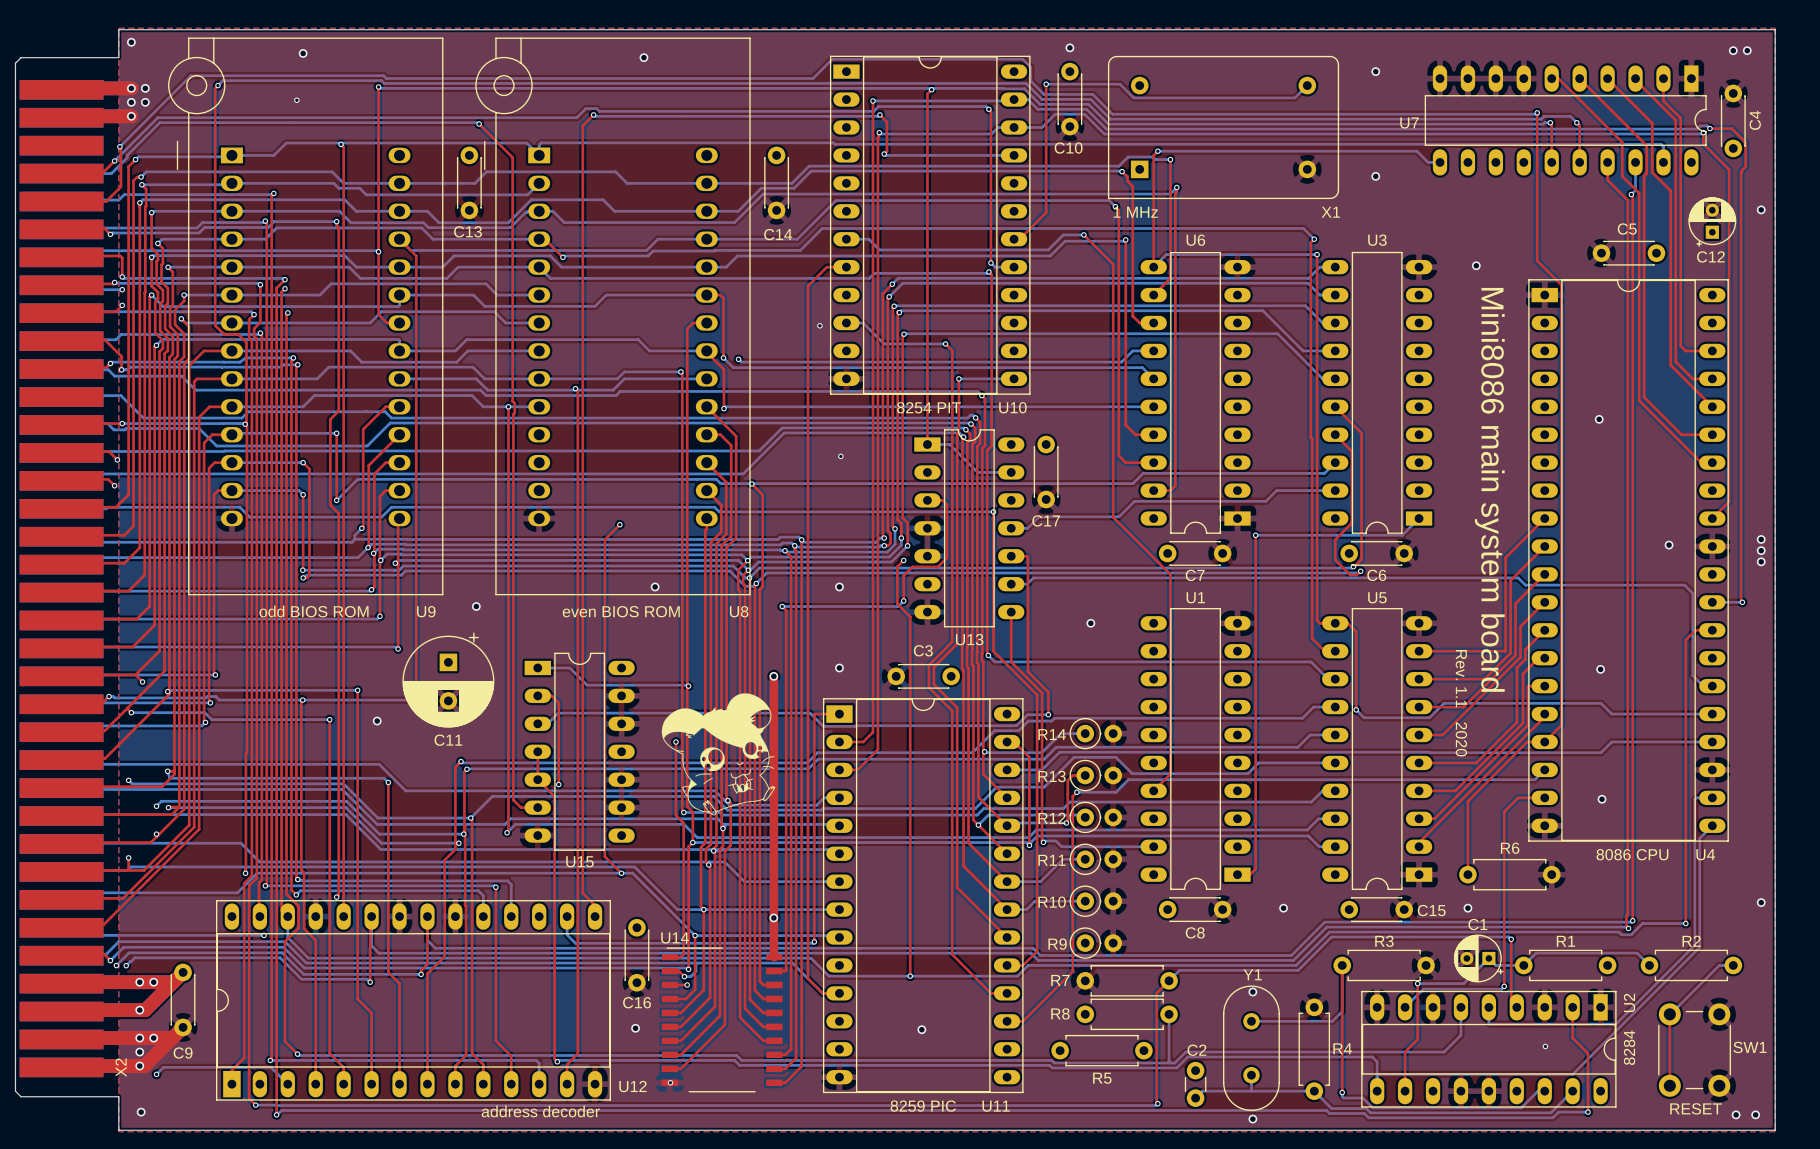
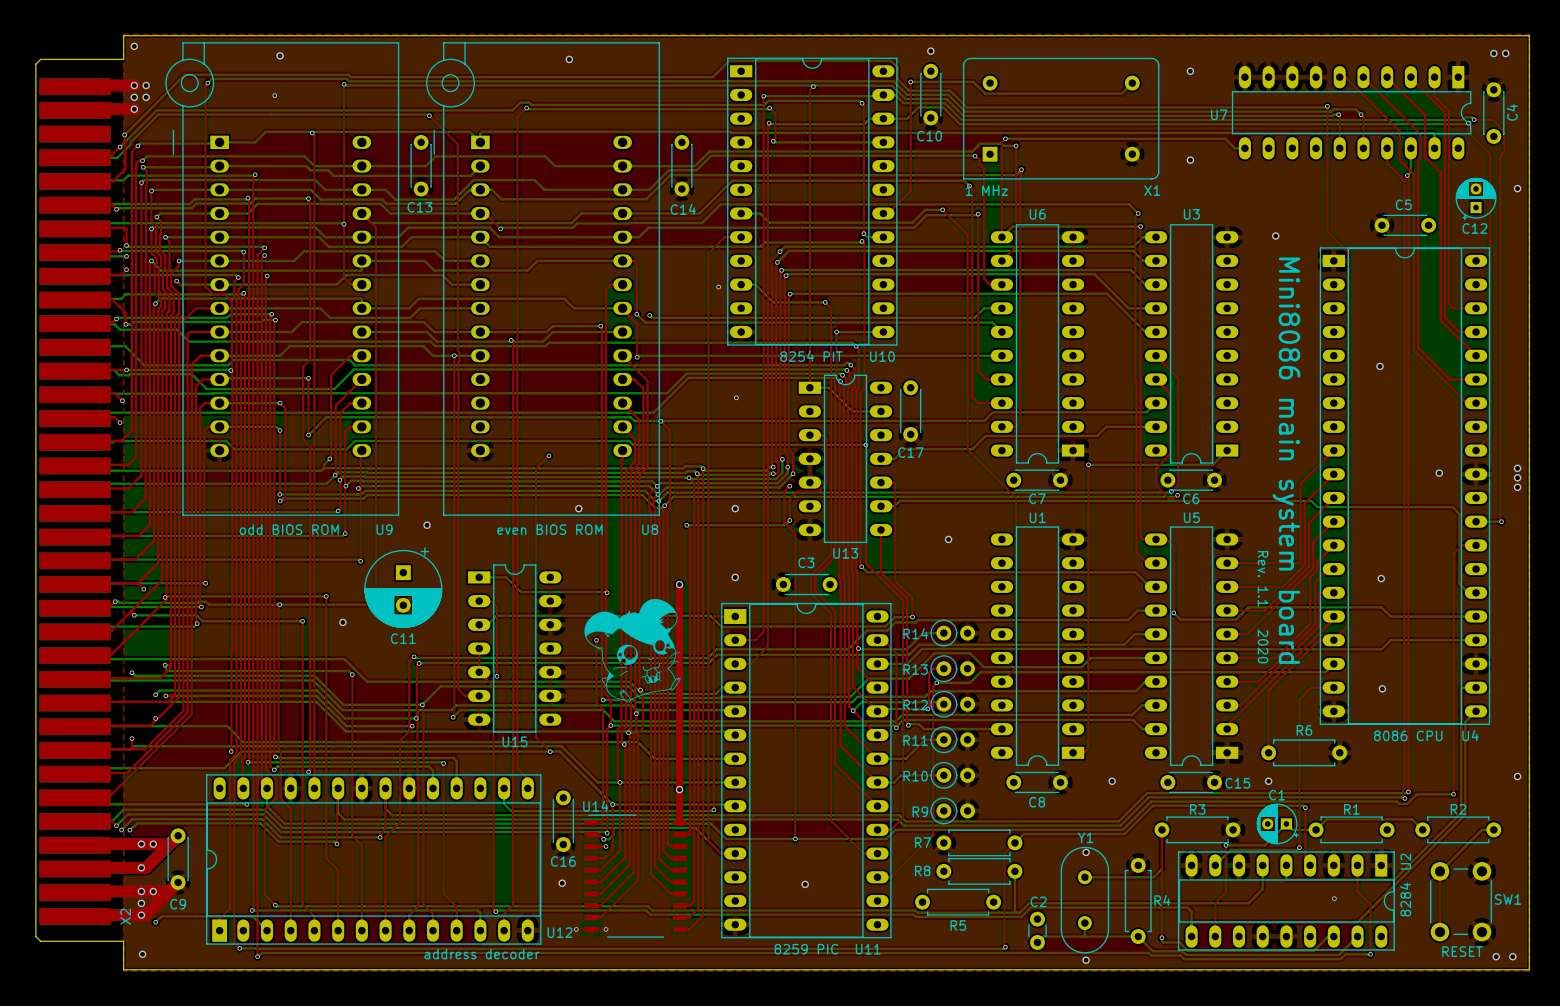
via: none -> (576, 929)
via: (670, 1082) -> none
via: none -> (606, 929)

